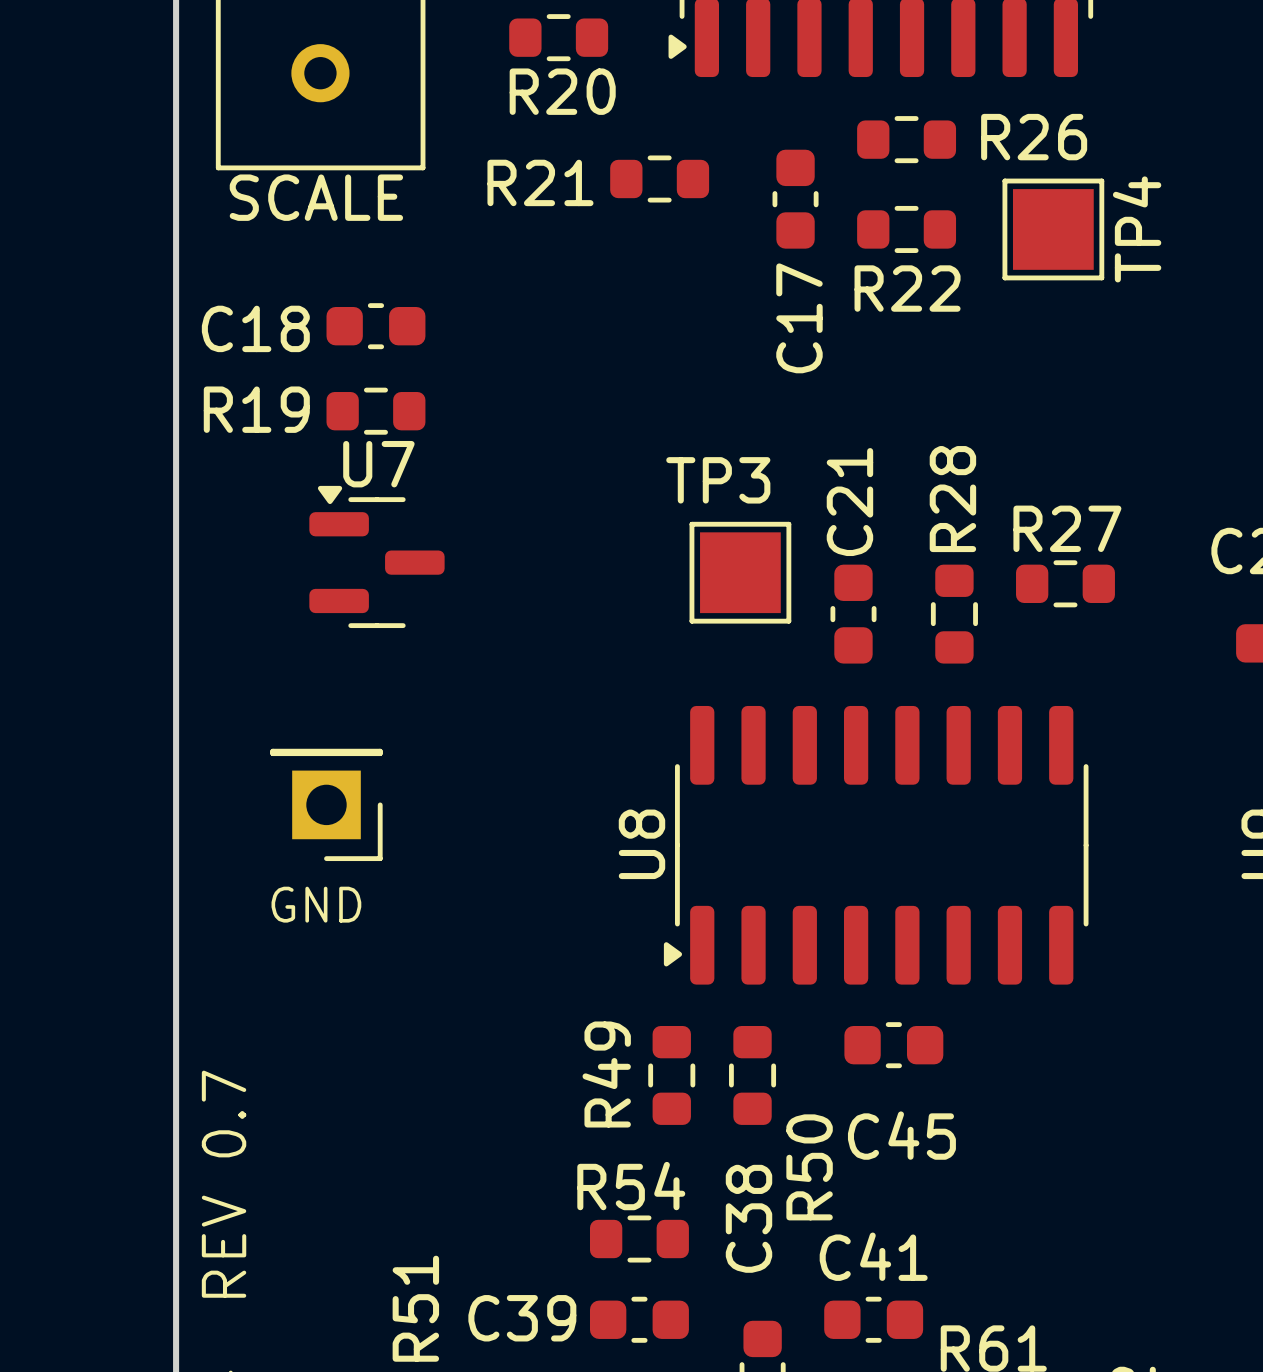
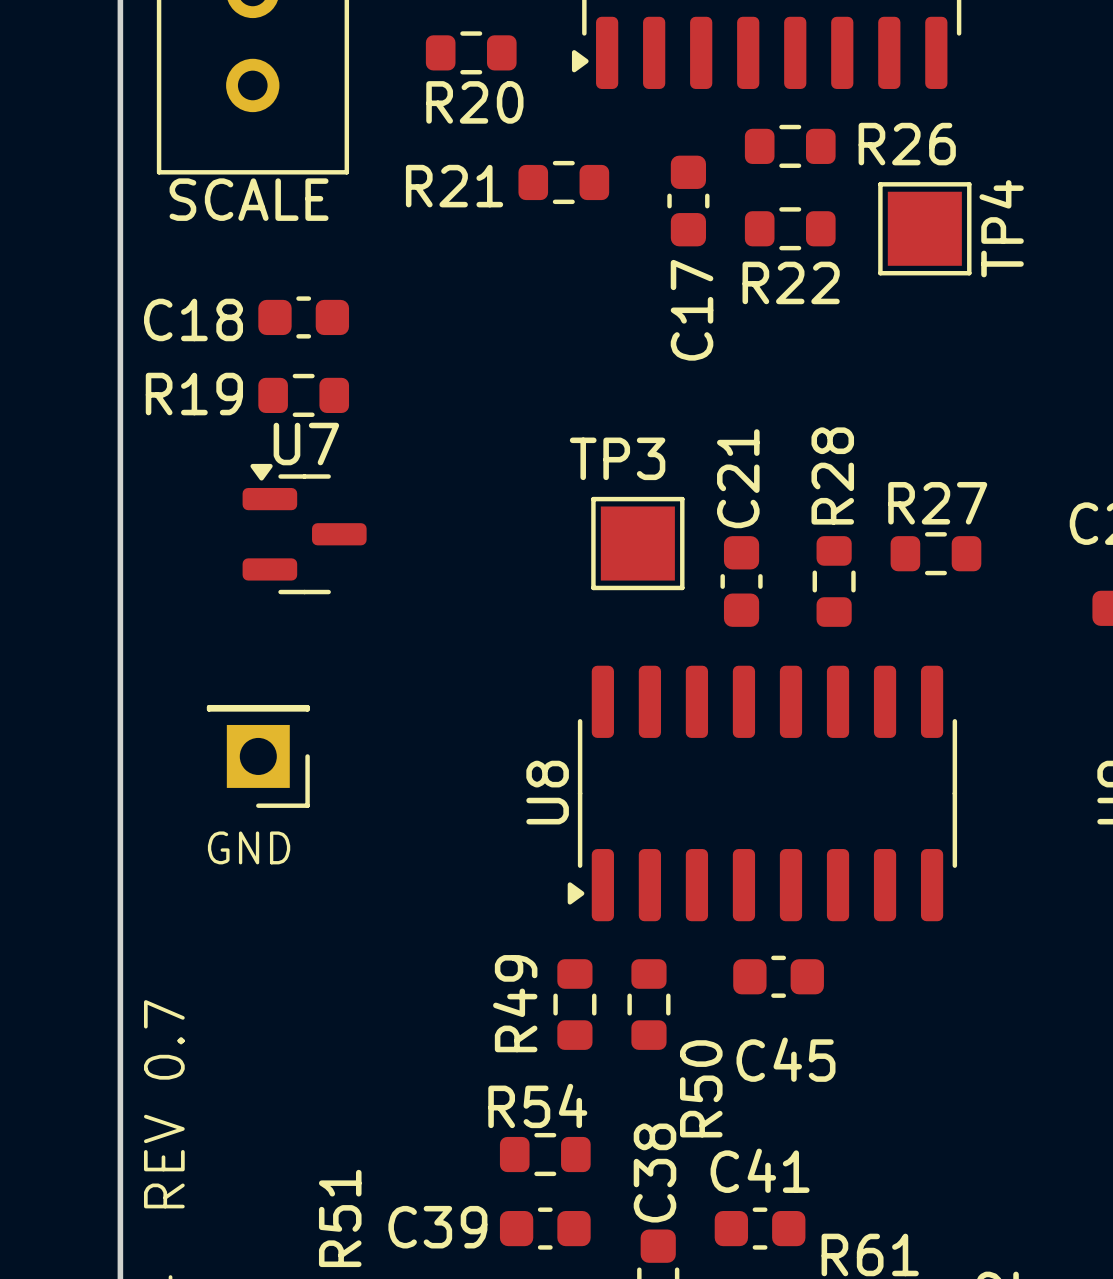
C38 name position: C38 (749, 1218) -> C38 (655, 1173)

